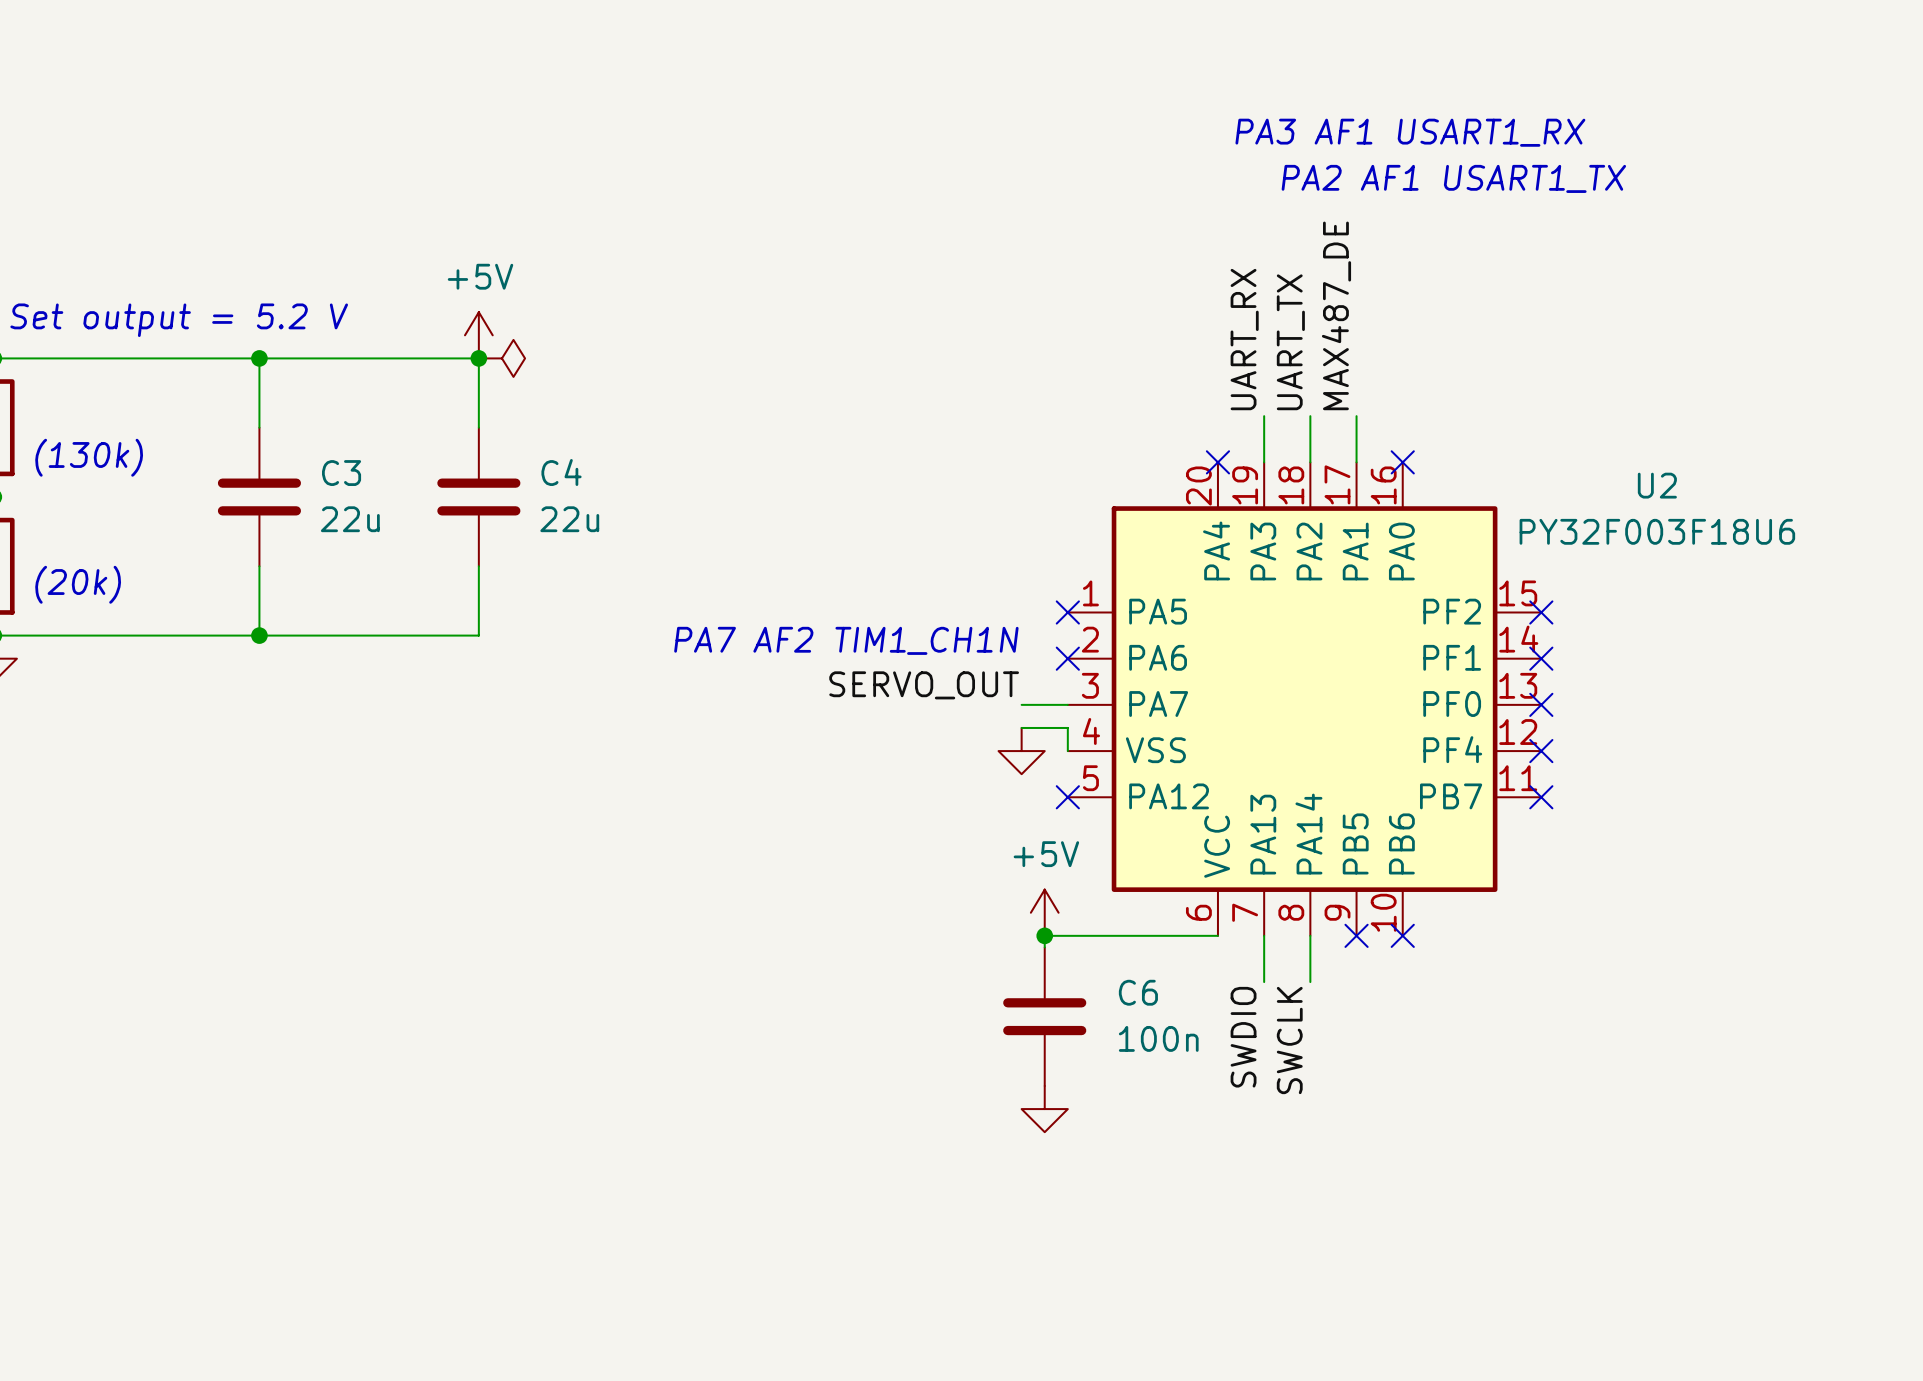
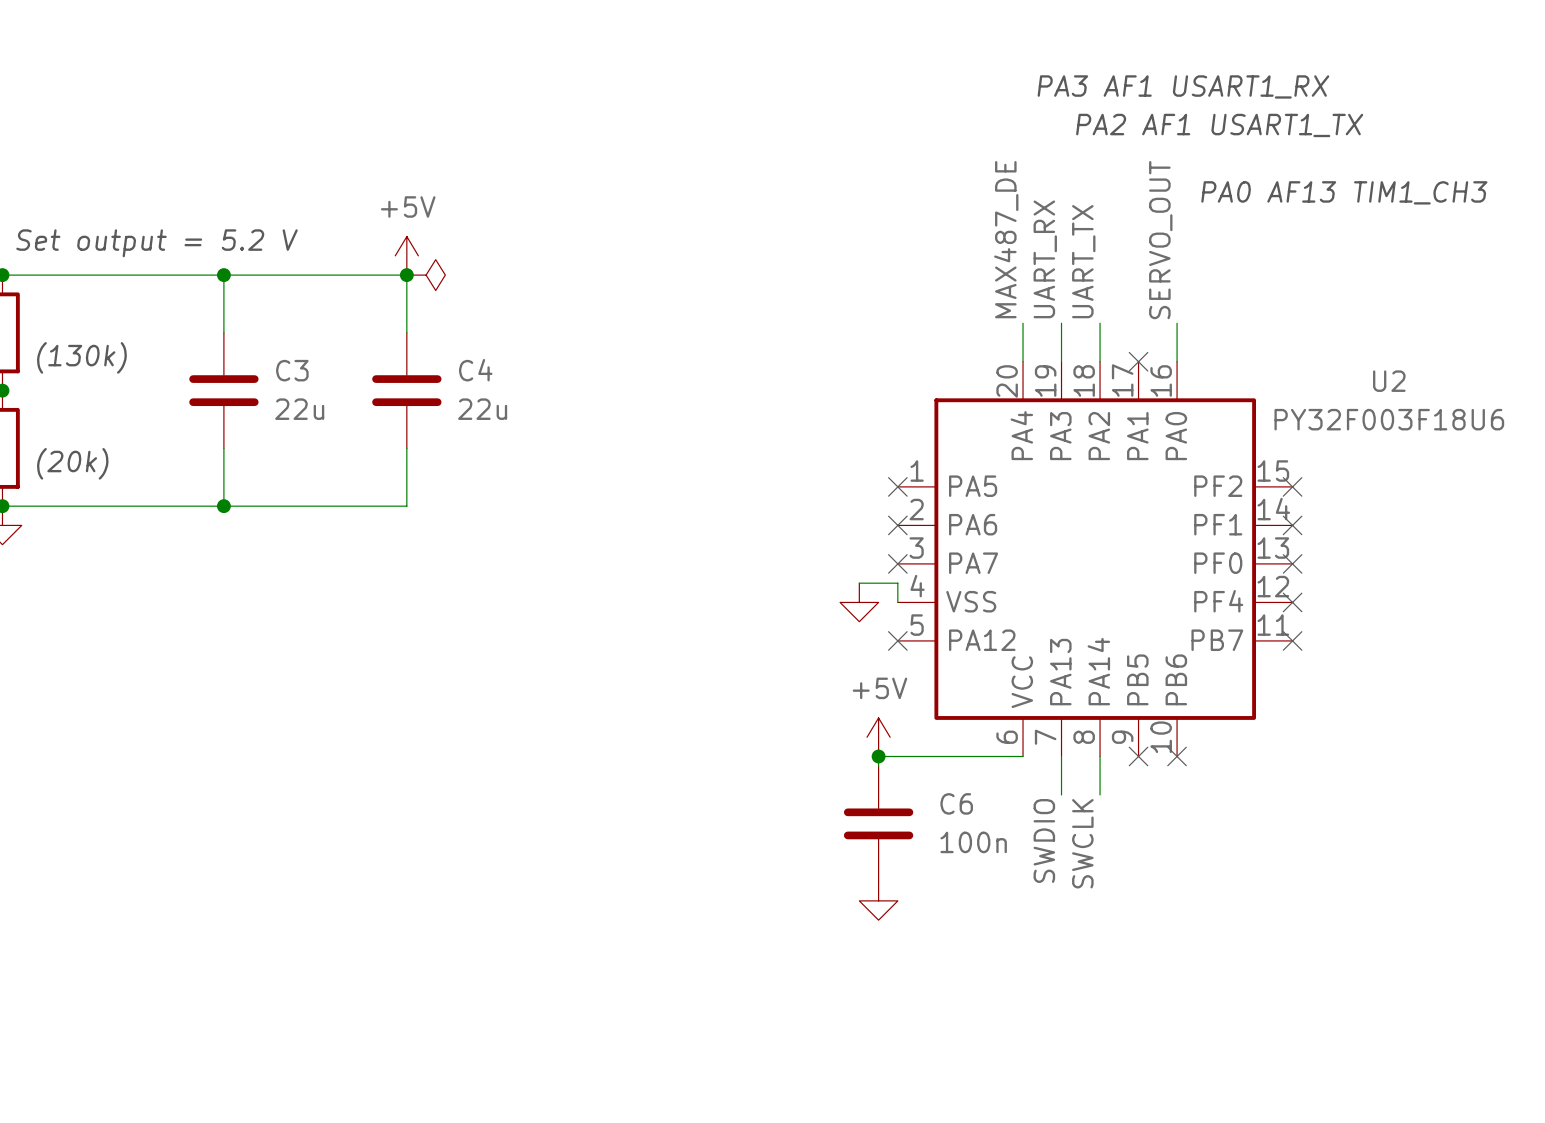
text: none -> PA0 AF13 TIM1_CH3 (1344, 192)
label position: MAX487_DE (1336, 315) -> MAX487_DE (1006, 239)
label: none -> SERVO_OUT (1160, 240)
wire: none -> (1023, 323) (1023, 361)
wire: (1356, 416) (1356, 462) -> (1177, 323) (1177, 361)
no-connect mark: (1217, 462) -> none
no-connect mark position: (1402, 462) -> (1138, 361)
text: PA7 AF2 TIM1_CH1N (846, 640) -> none
label: SERVO_OUT (924, 685) -> none
wire: (1021, 704) (1067, 704) -> none
no-connect mark: none -> (897, 563)

